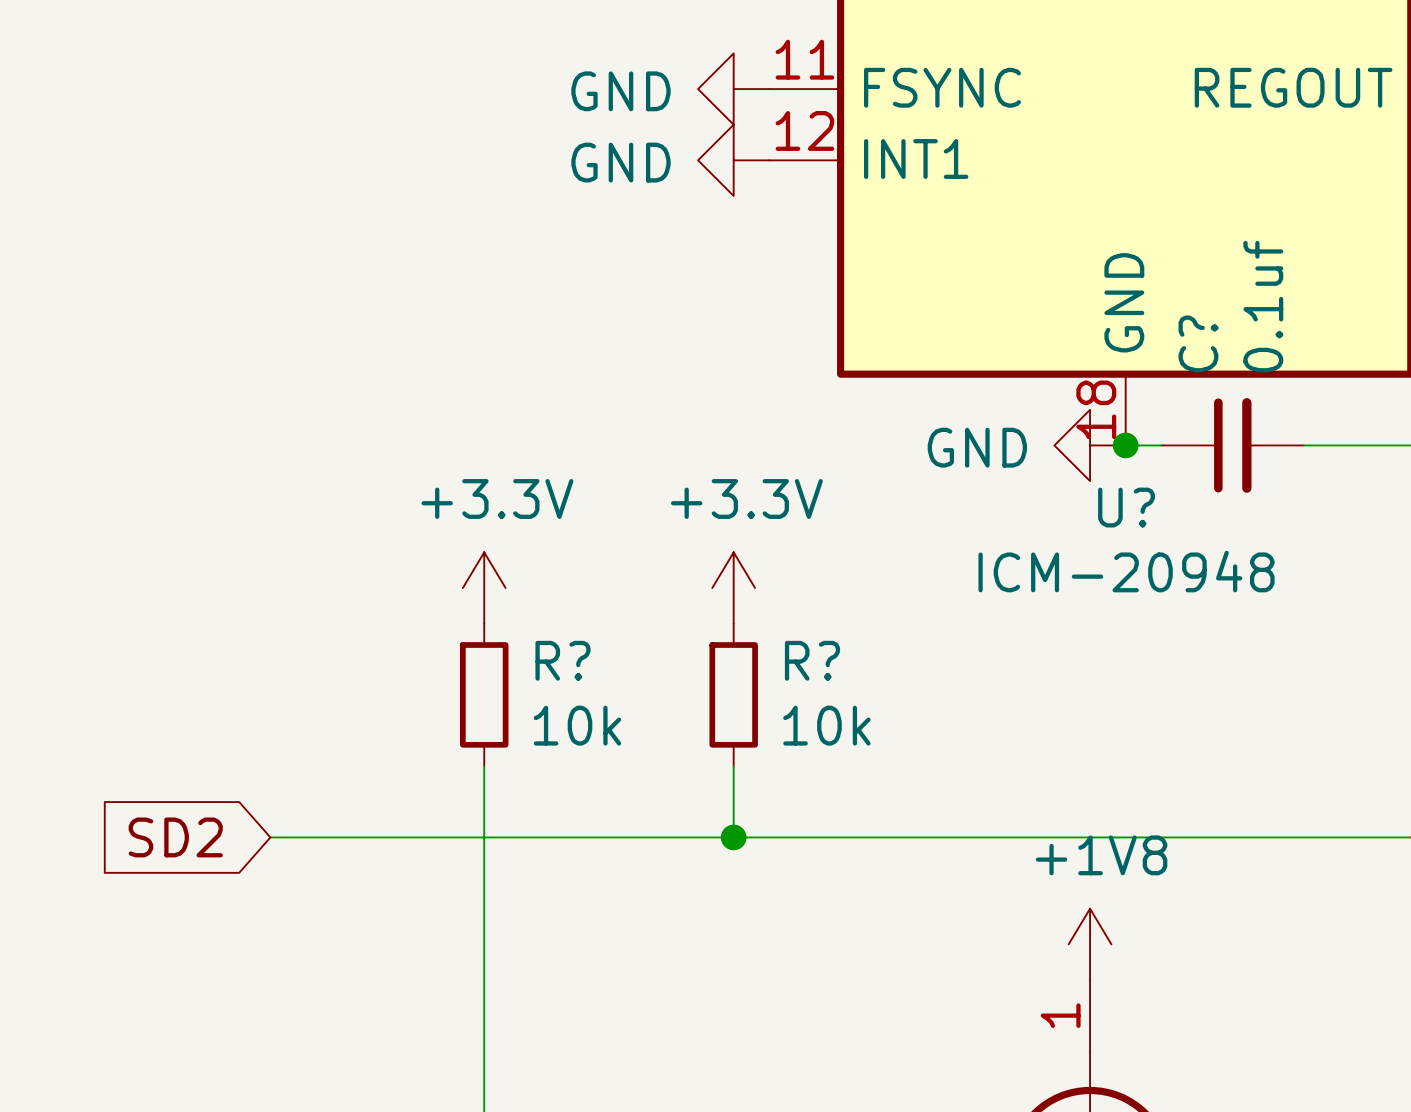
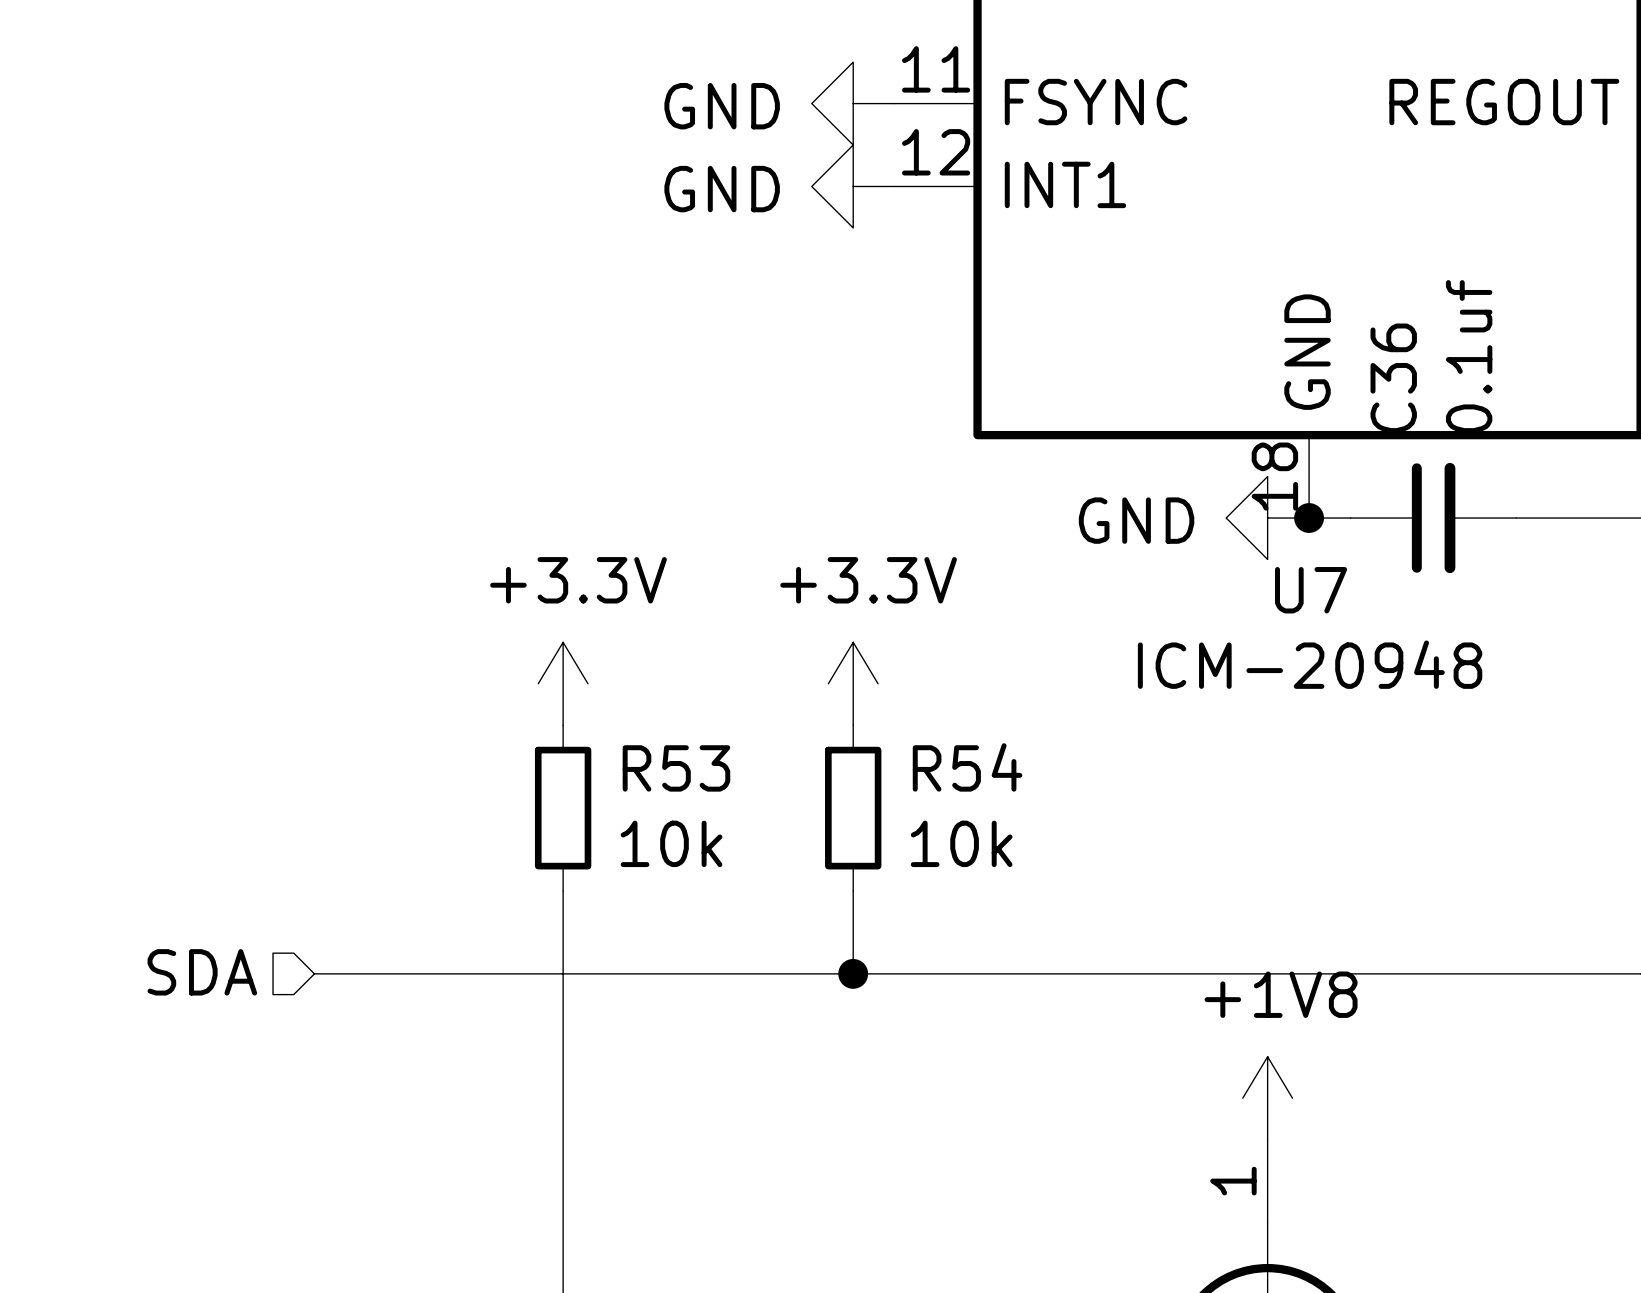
C? name: C? (1198, 343) -> C36 (1393, 378)
U? name: U? (1126, 507) -> U7 (1311, 590)
R? name: R? (563, 660) -> R53 (676, 768)
R? name: R? (812, 660) -> R54 (967, 767)
hierarchical label: none -> SDA (202, 972)
global label: SD2 (175, 837) -> none

